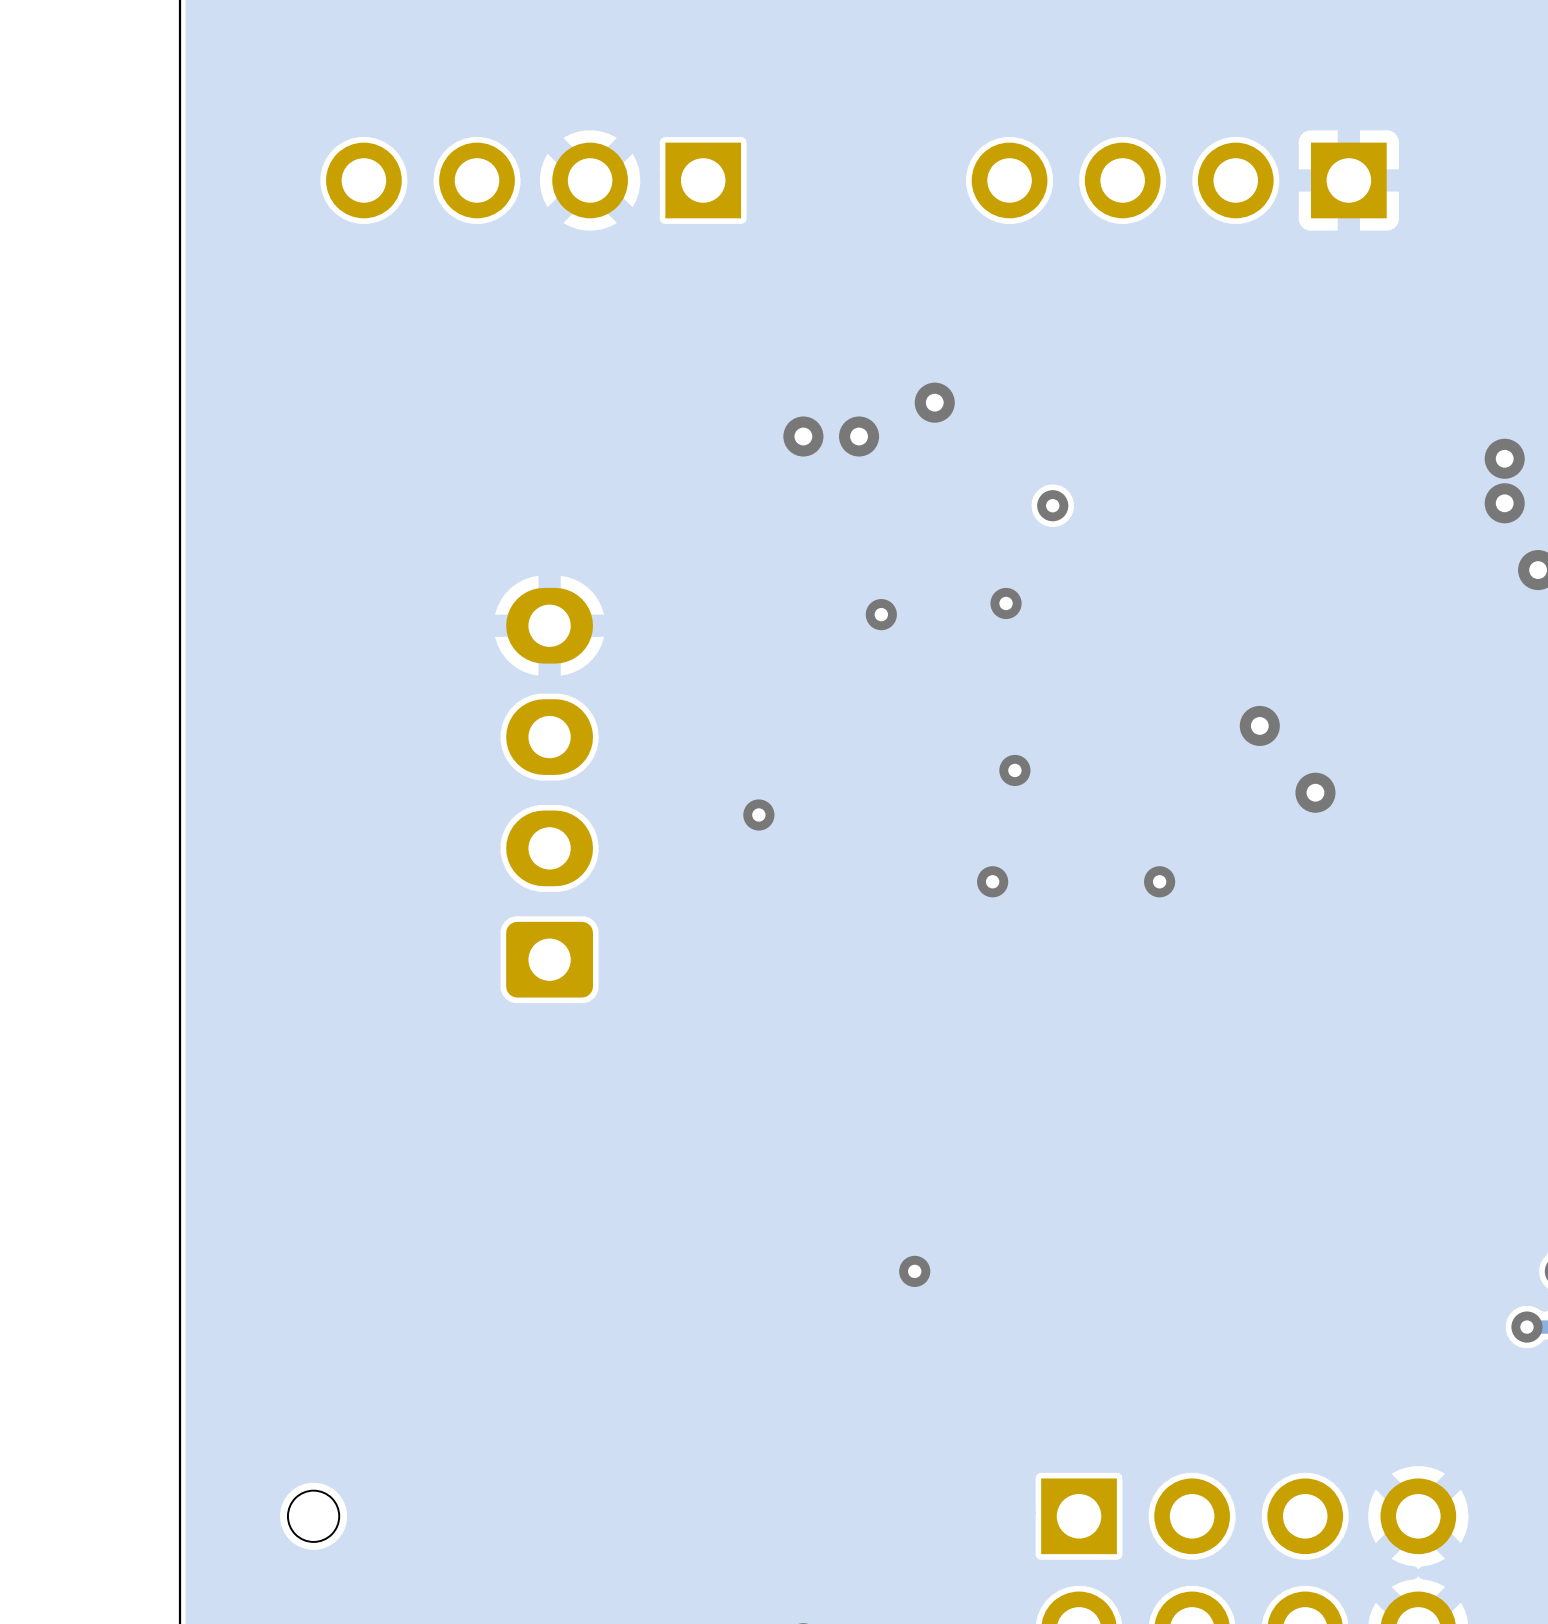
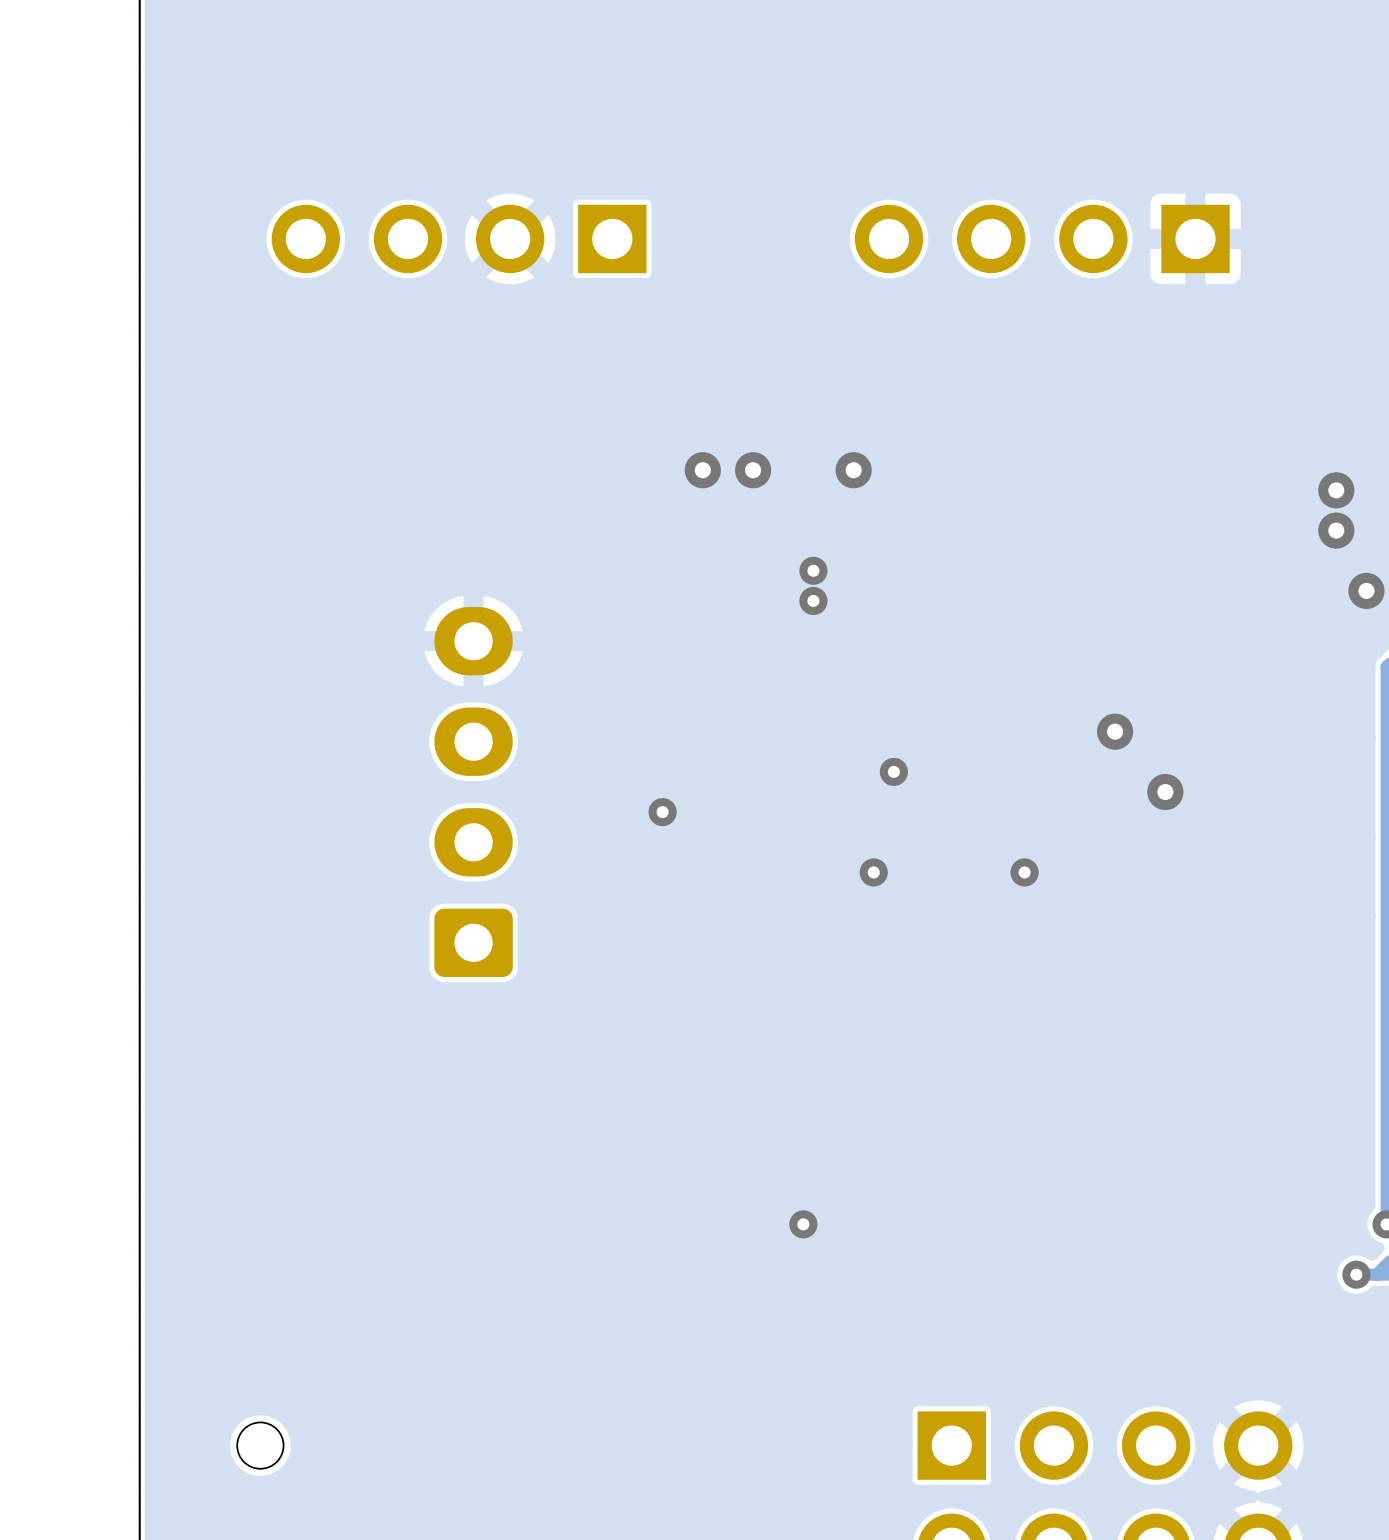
via position: (934, 402) -> (853, 470)
via: (1052, 505) -> none
via: none -> (813, 570)
via: none -> (813, 600)
via: (1006, 603) -> none
via: (881, 614) -> none

